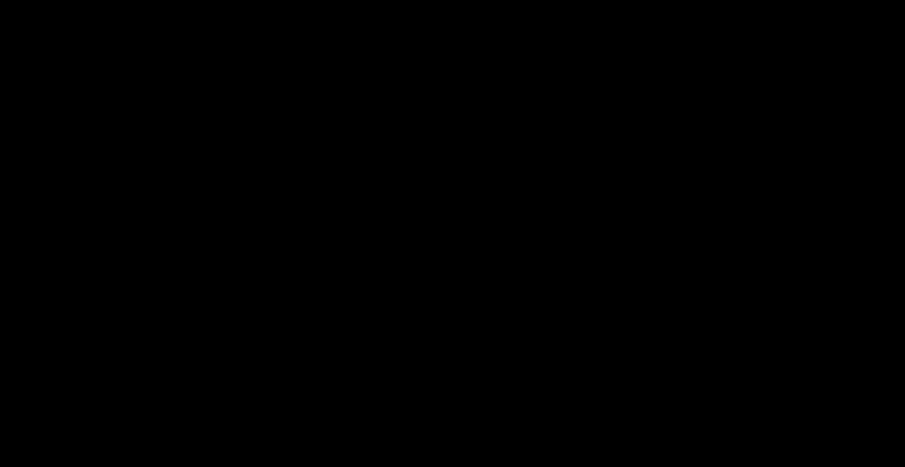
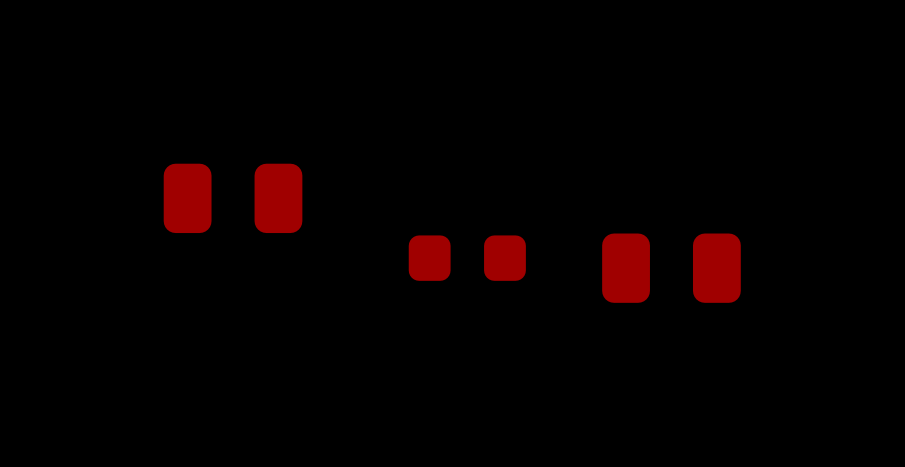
part: none -> (233, 198)
part: none -> (467, 258)
part: none -> (671, 268)

